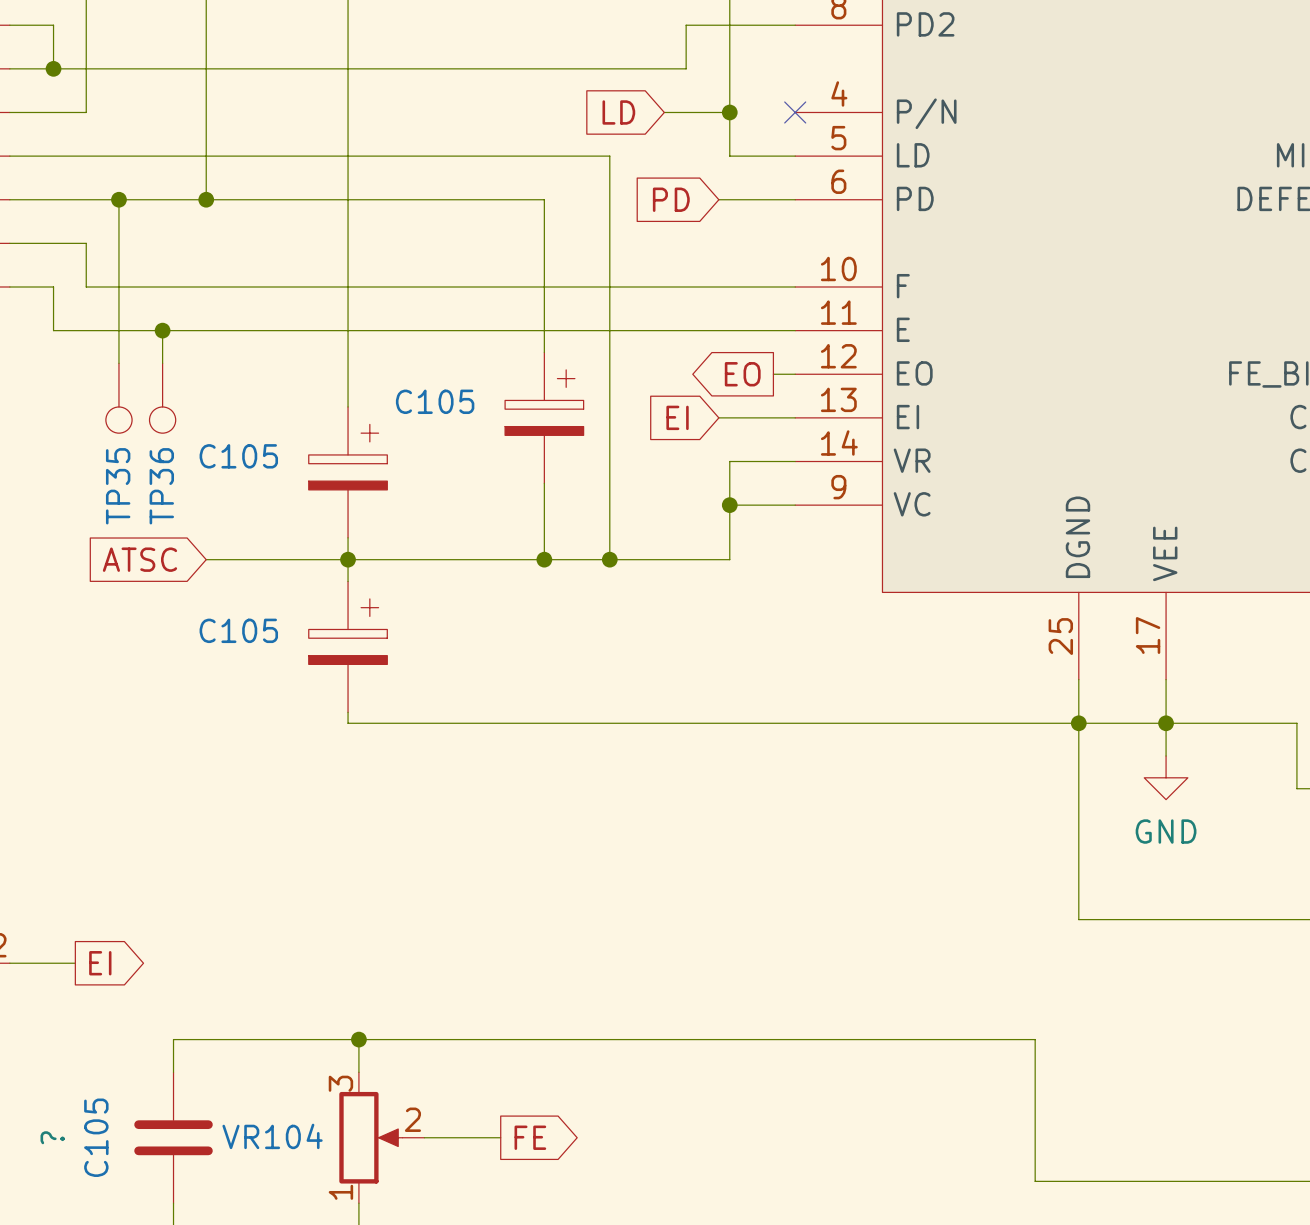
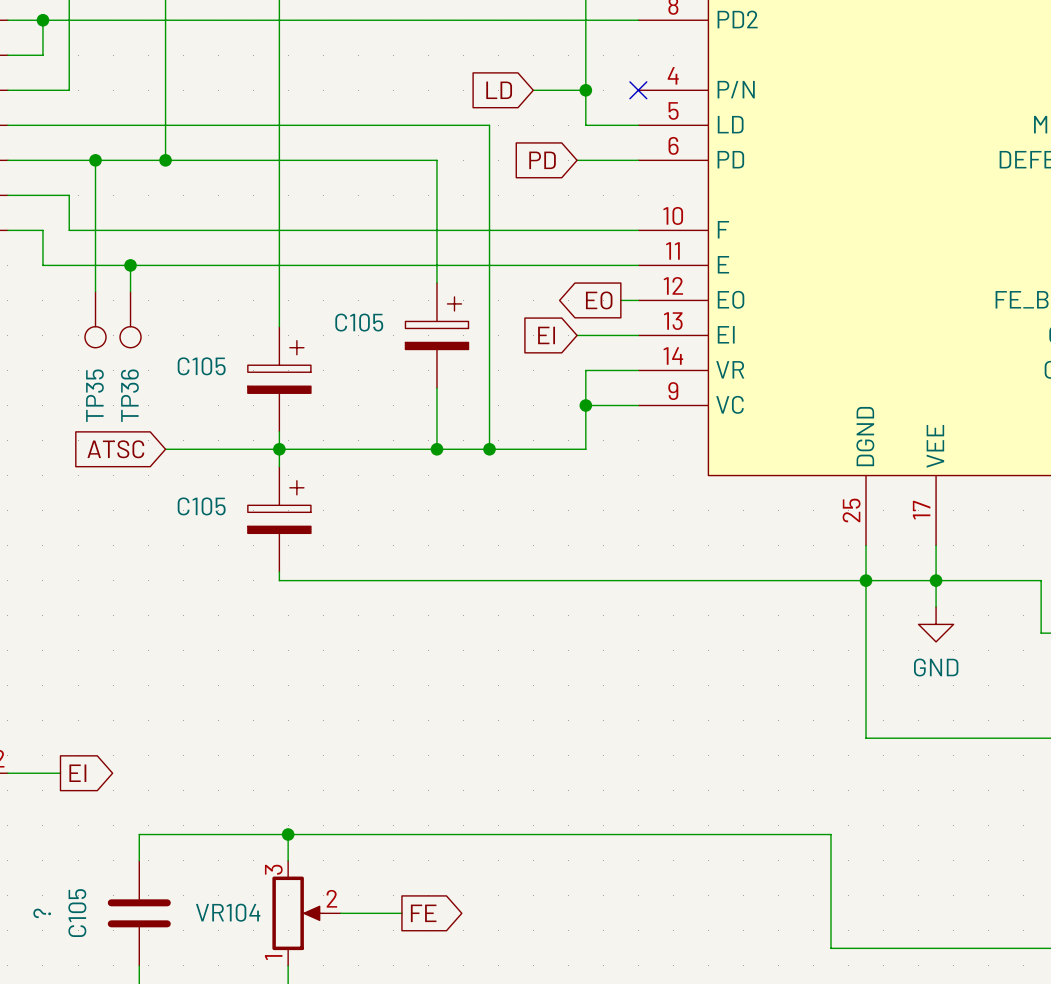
wire: (686, 25) (686, 68) (53, 68) -> (550, 20) (42, 20)
junction position: (53, 68) -> (42, 20)

